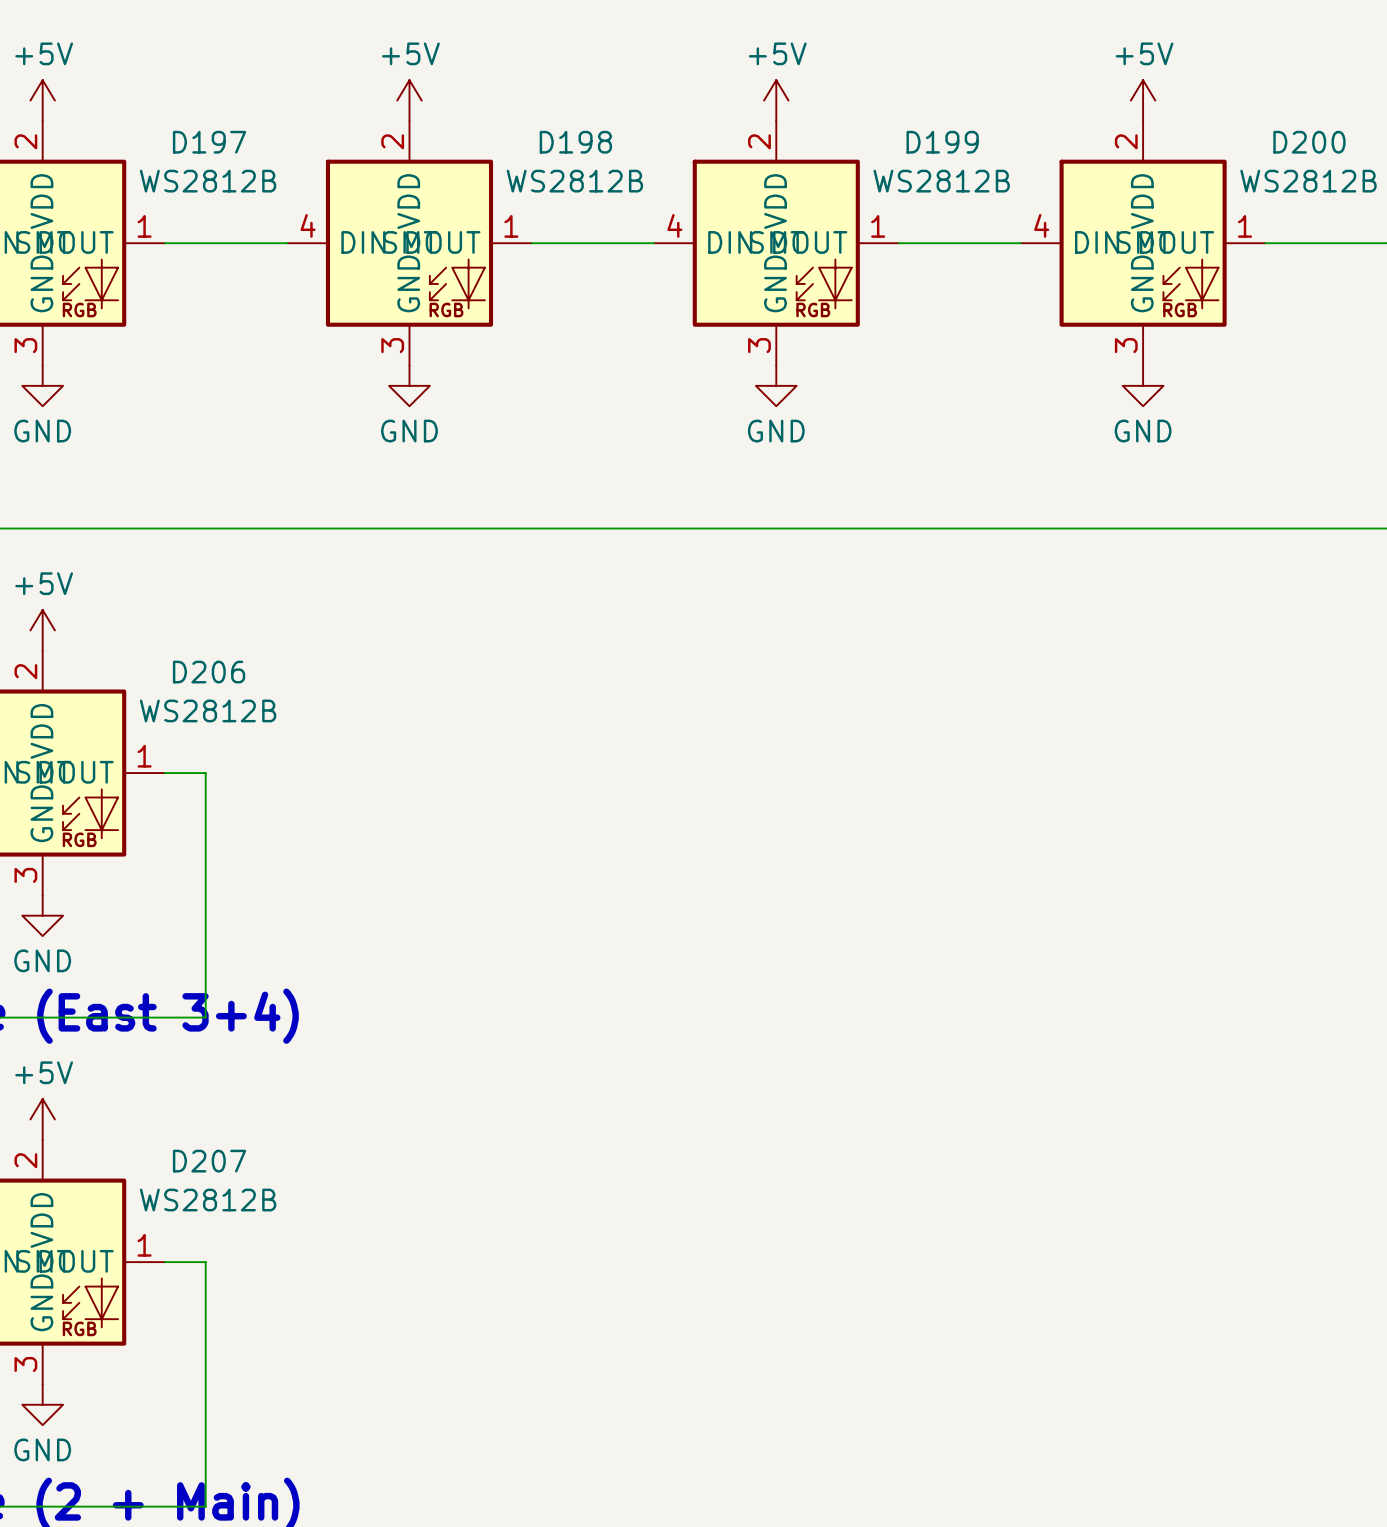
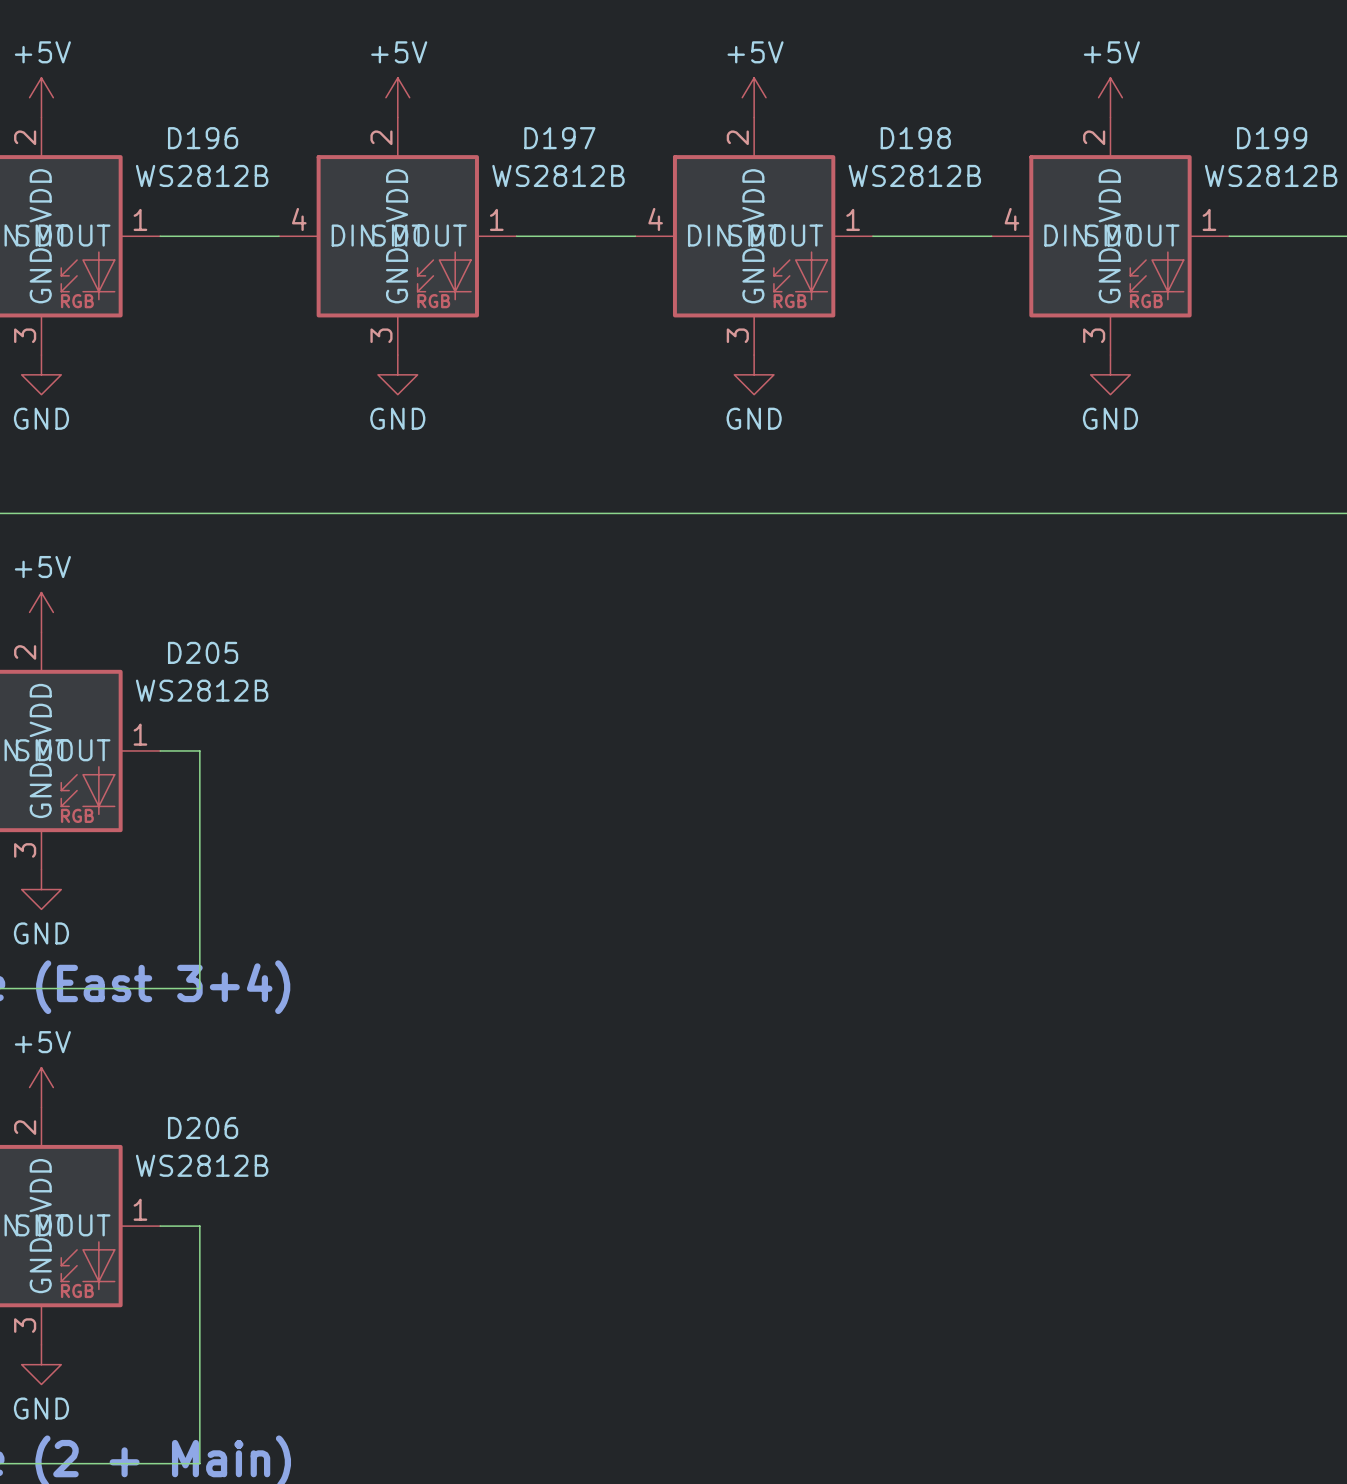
D197 name: D197 (209, 142) -> D196 (203, 138)
D198 name: D198 (575, 142) -> D197 (559, 138)
D199 name: D199 (942, 142) -> D198 (915, 138)
D200 name: D200 (1309, 142) -> D199 (1272, 138)
D206 name: D206 (209, 672) -> D205 (203, 652)
D207 name: D207 (209, 1161) -> D206 (203, 1127)

